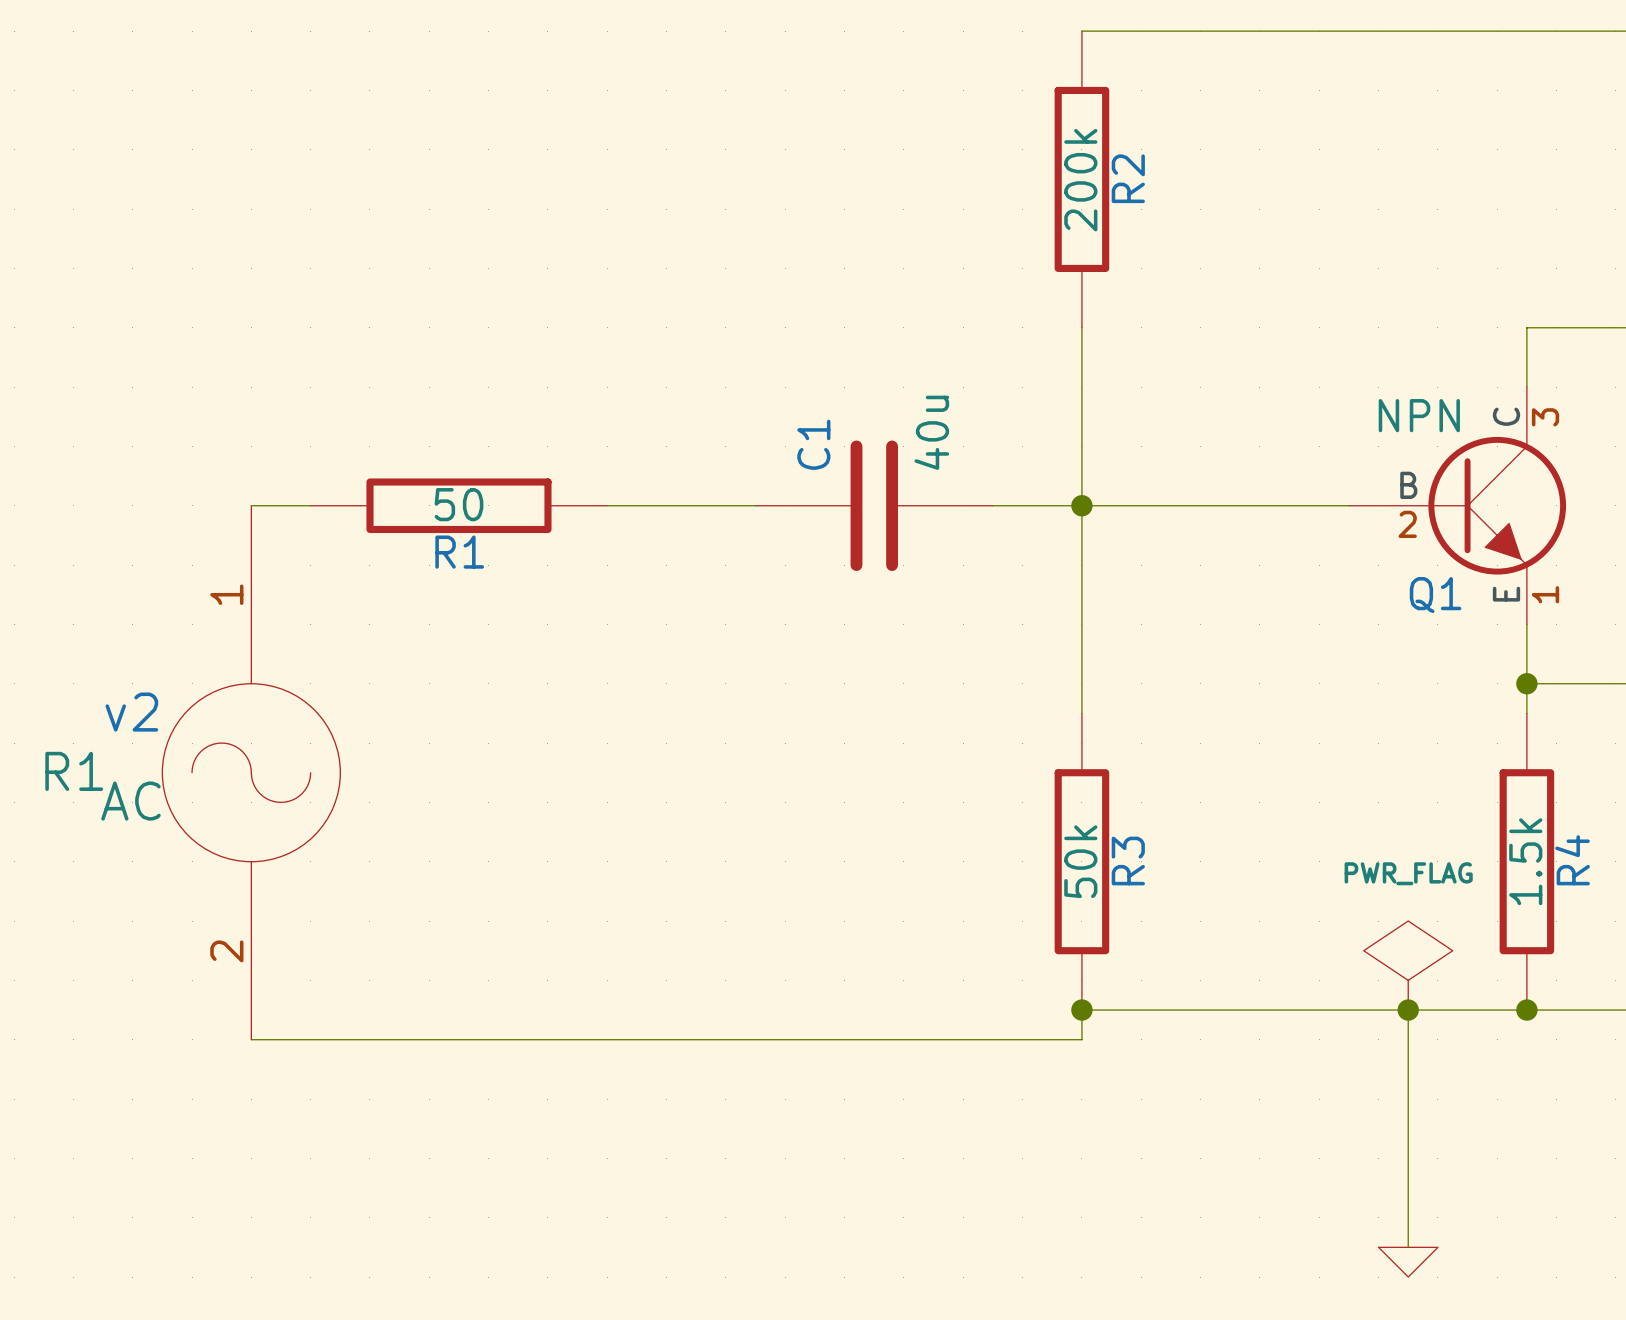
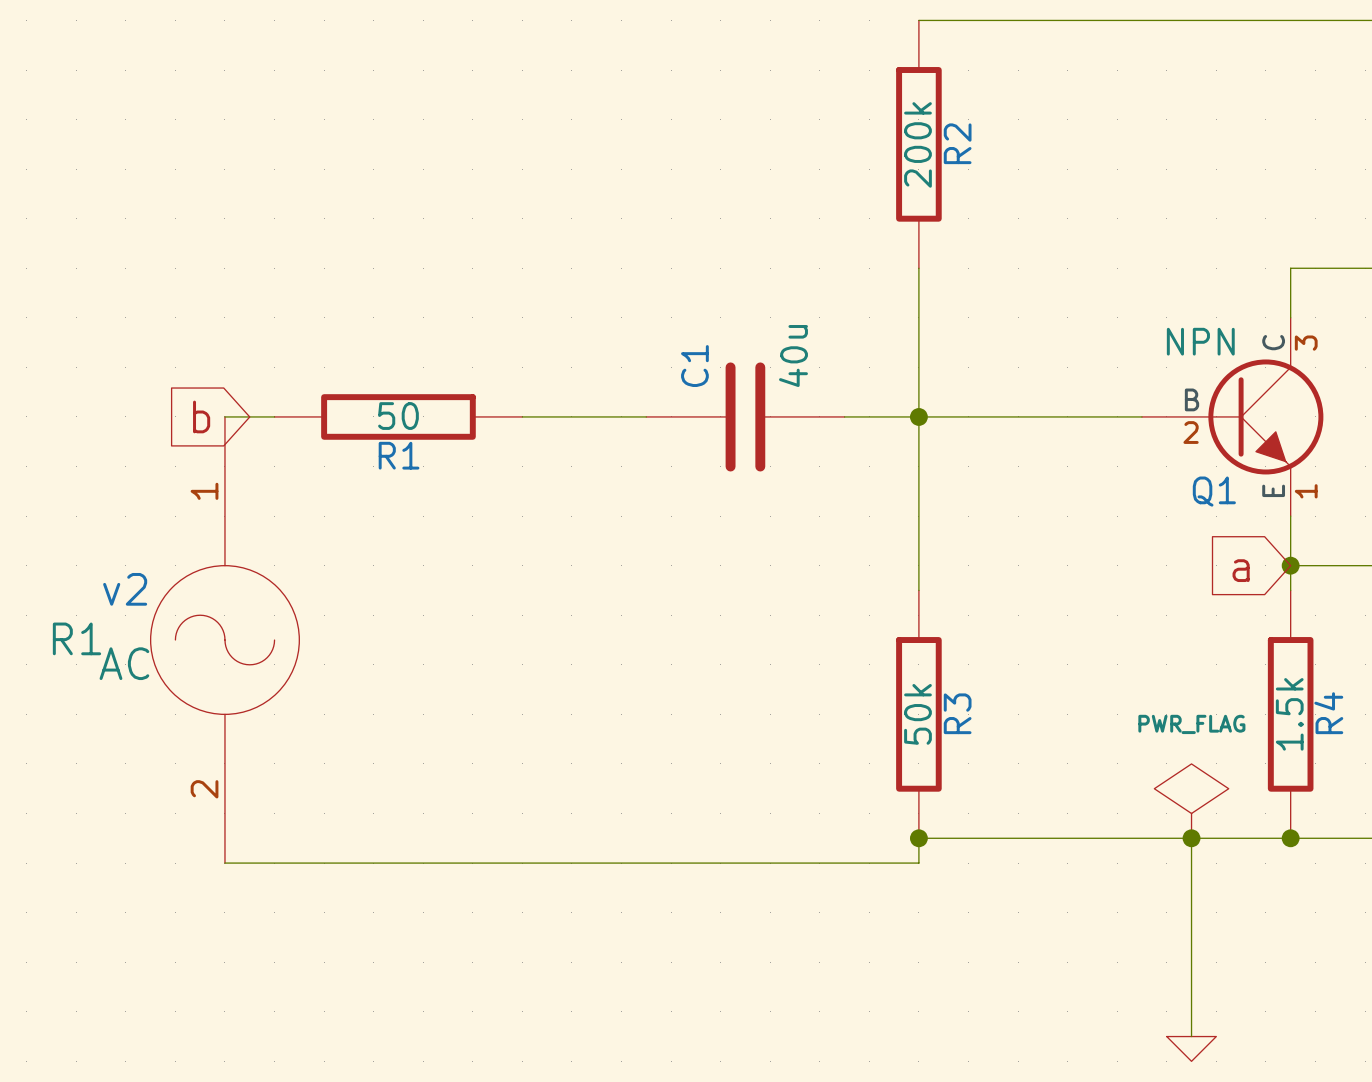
global label: none -> b (201, 416)
global label: none -> a (1241, 570)

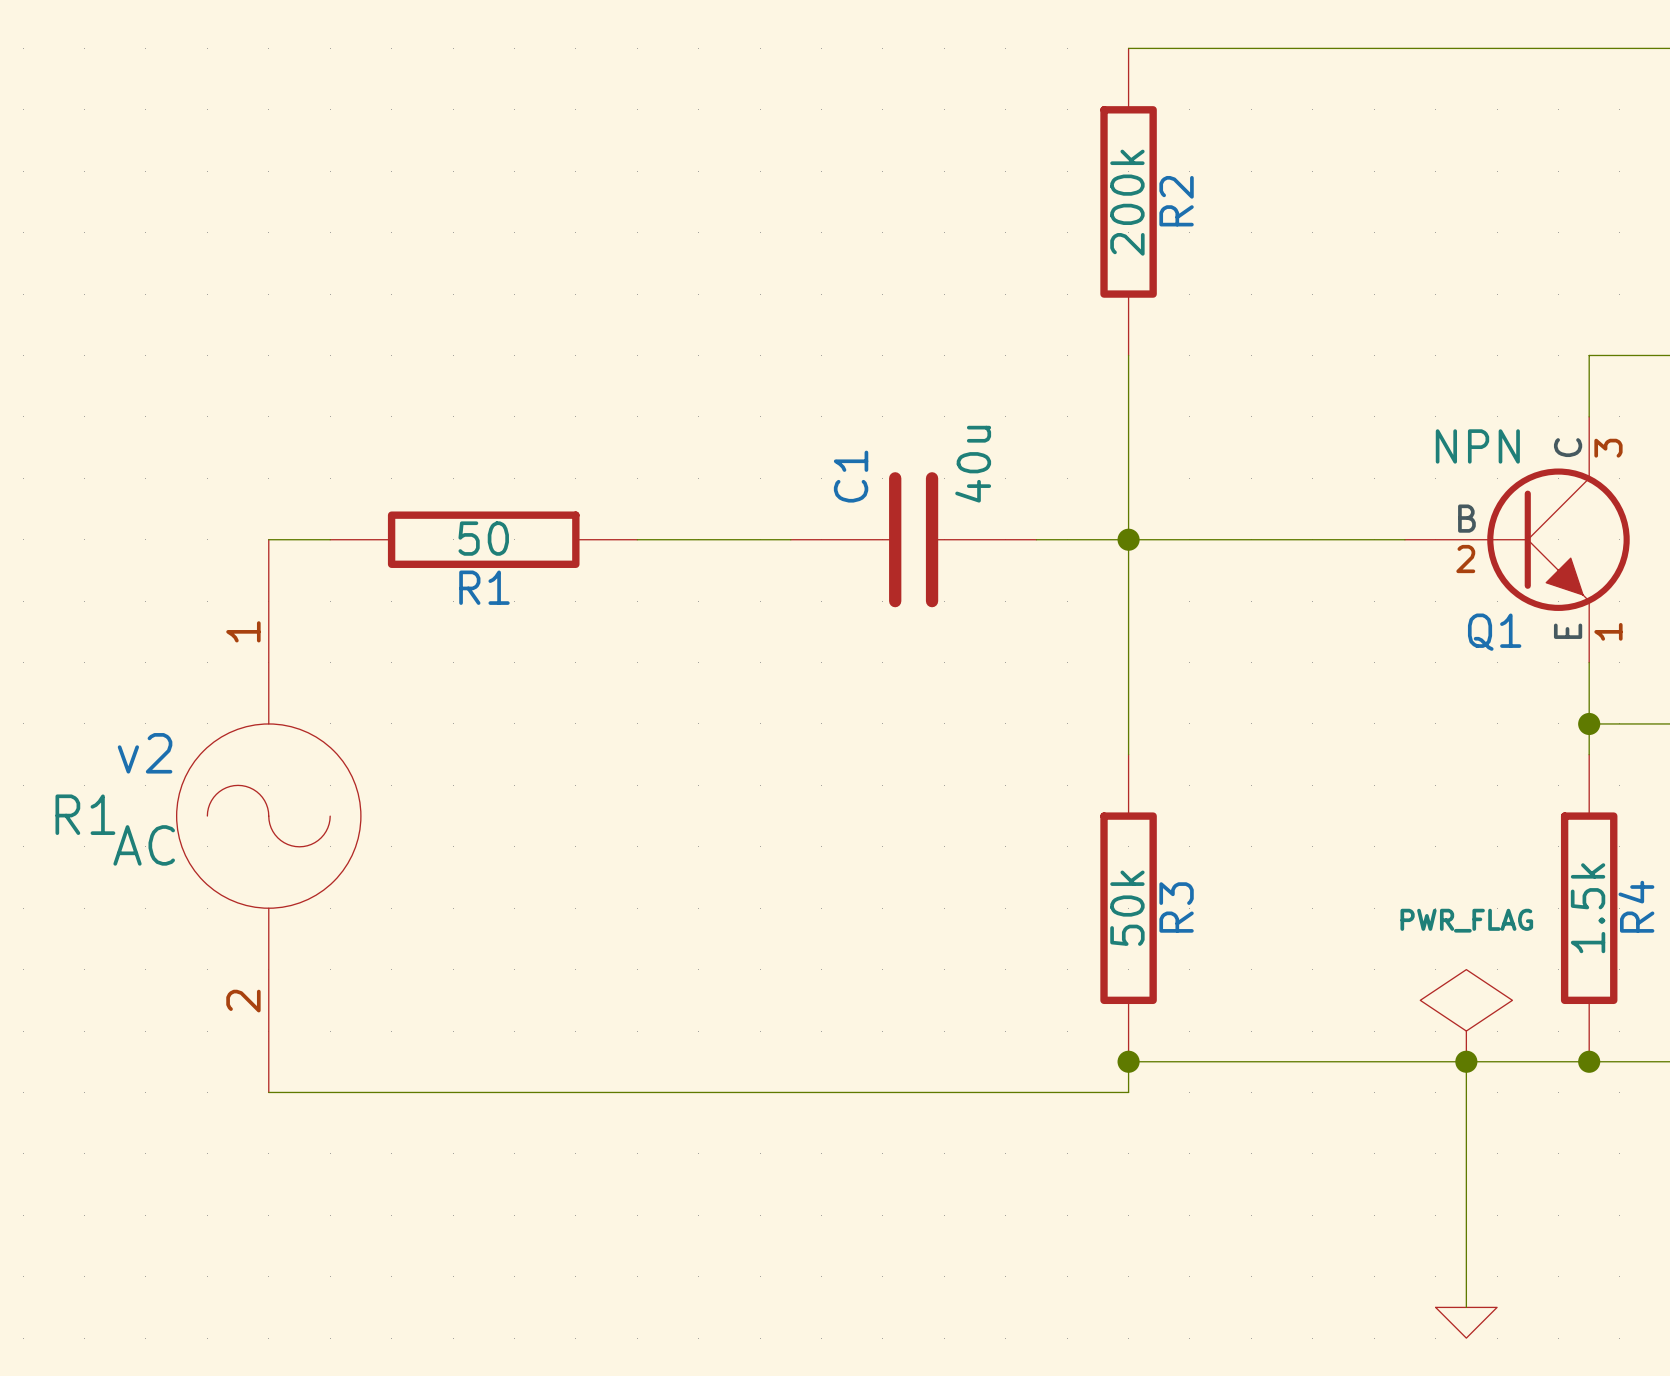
global label: b (201, 416) -> none
global label: a (1241, 570) -> none

